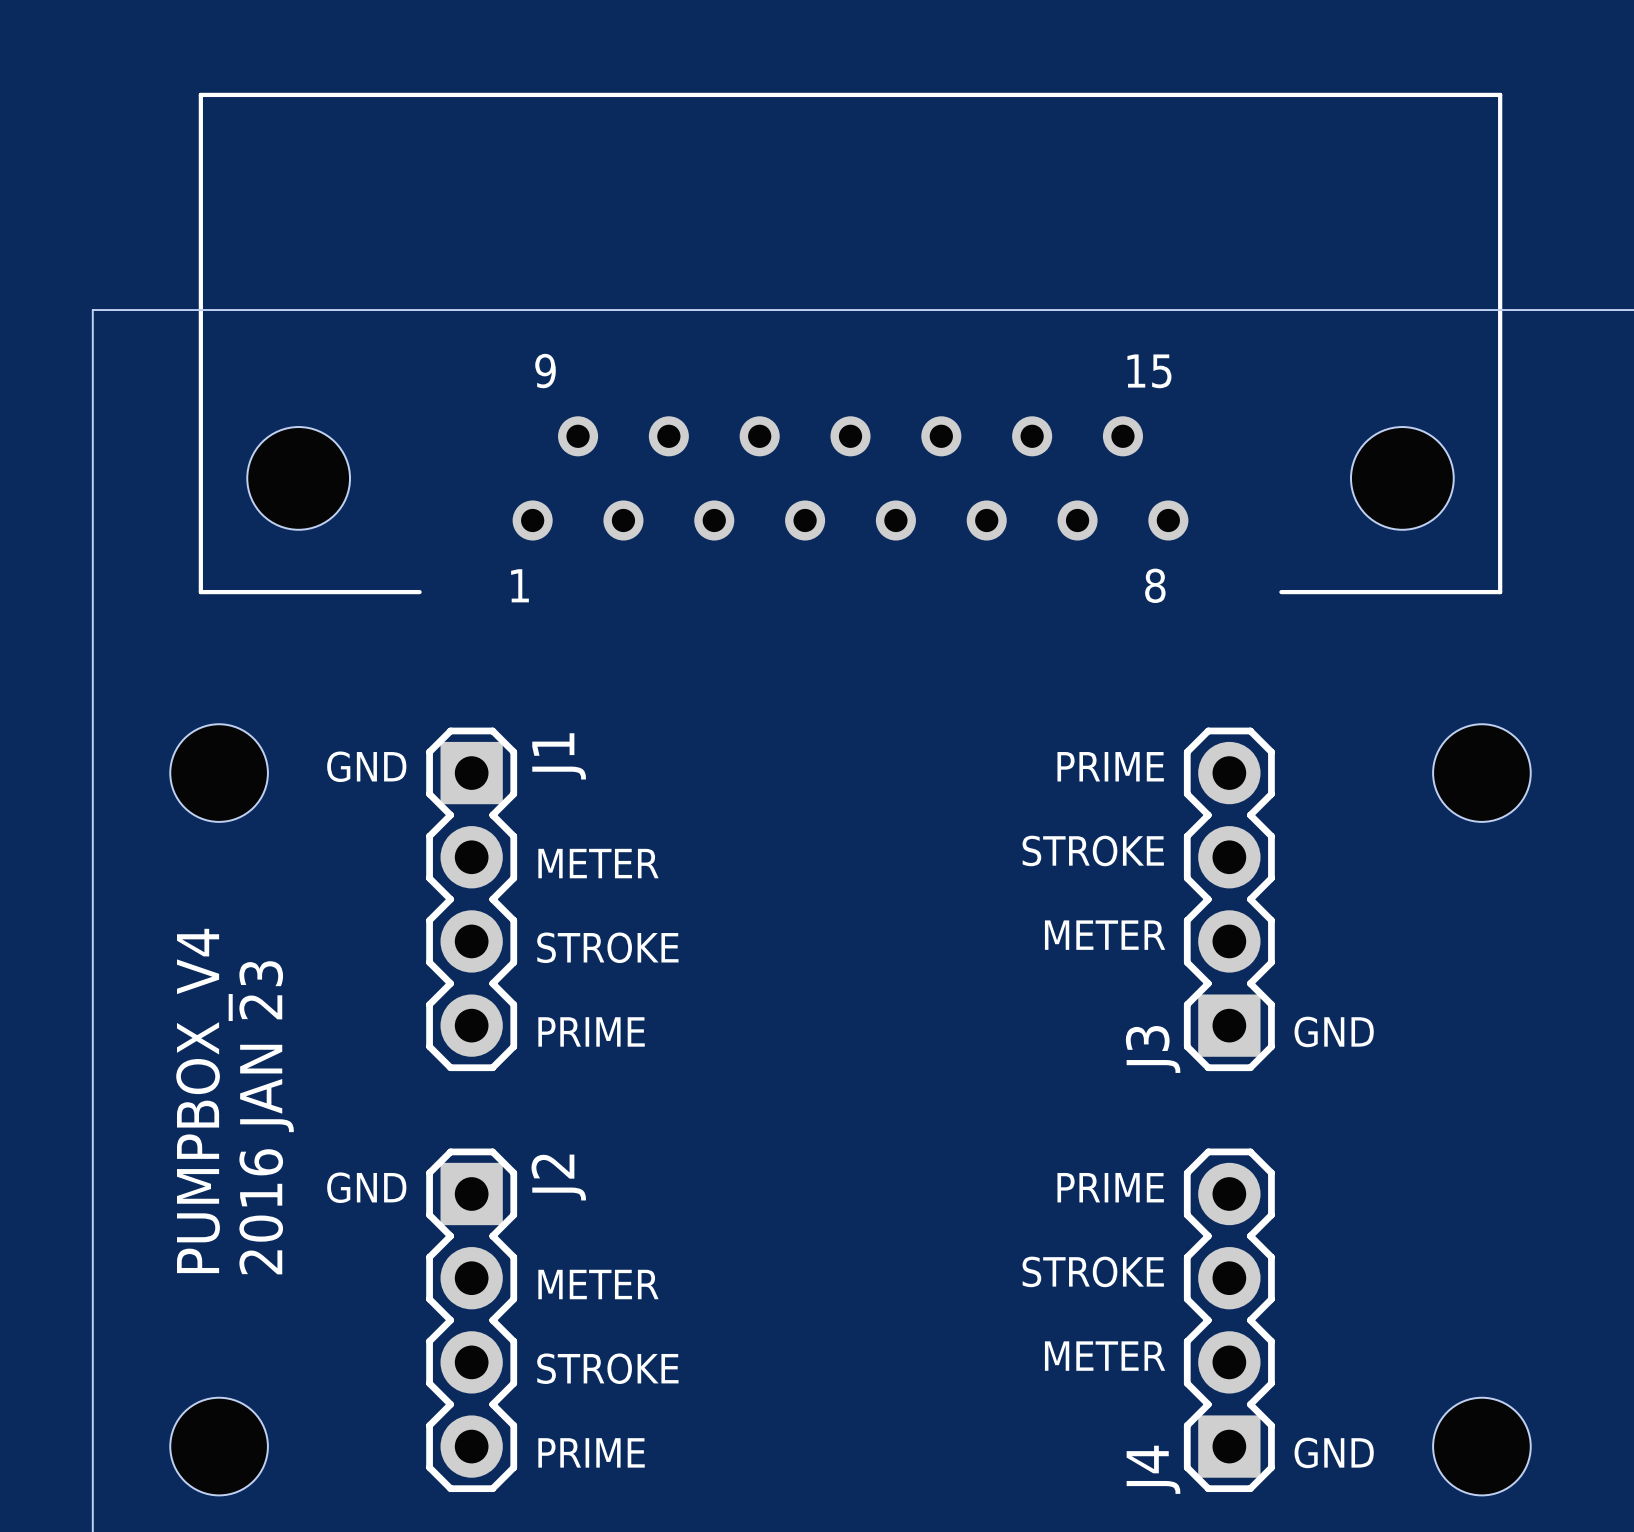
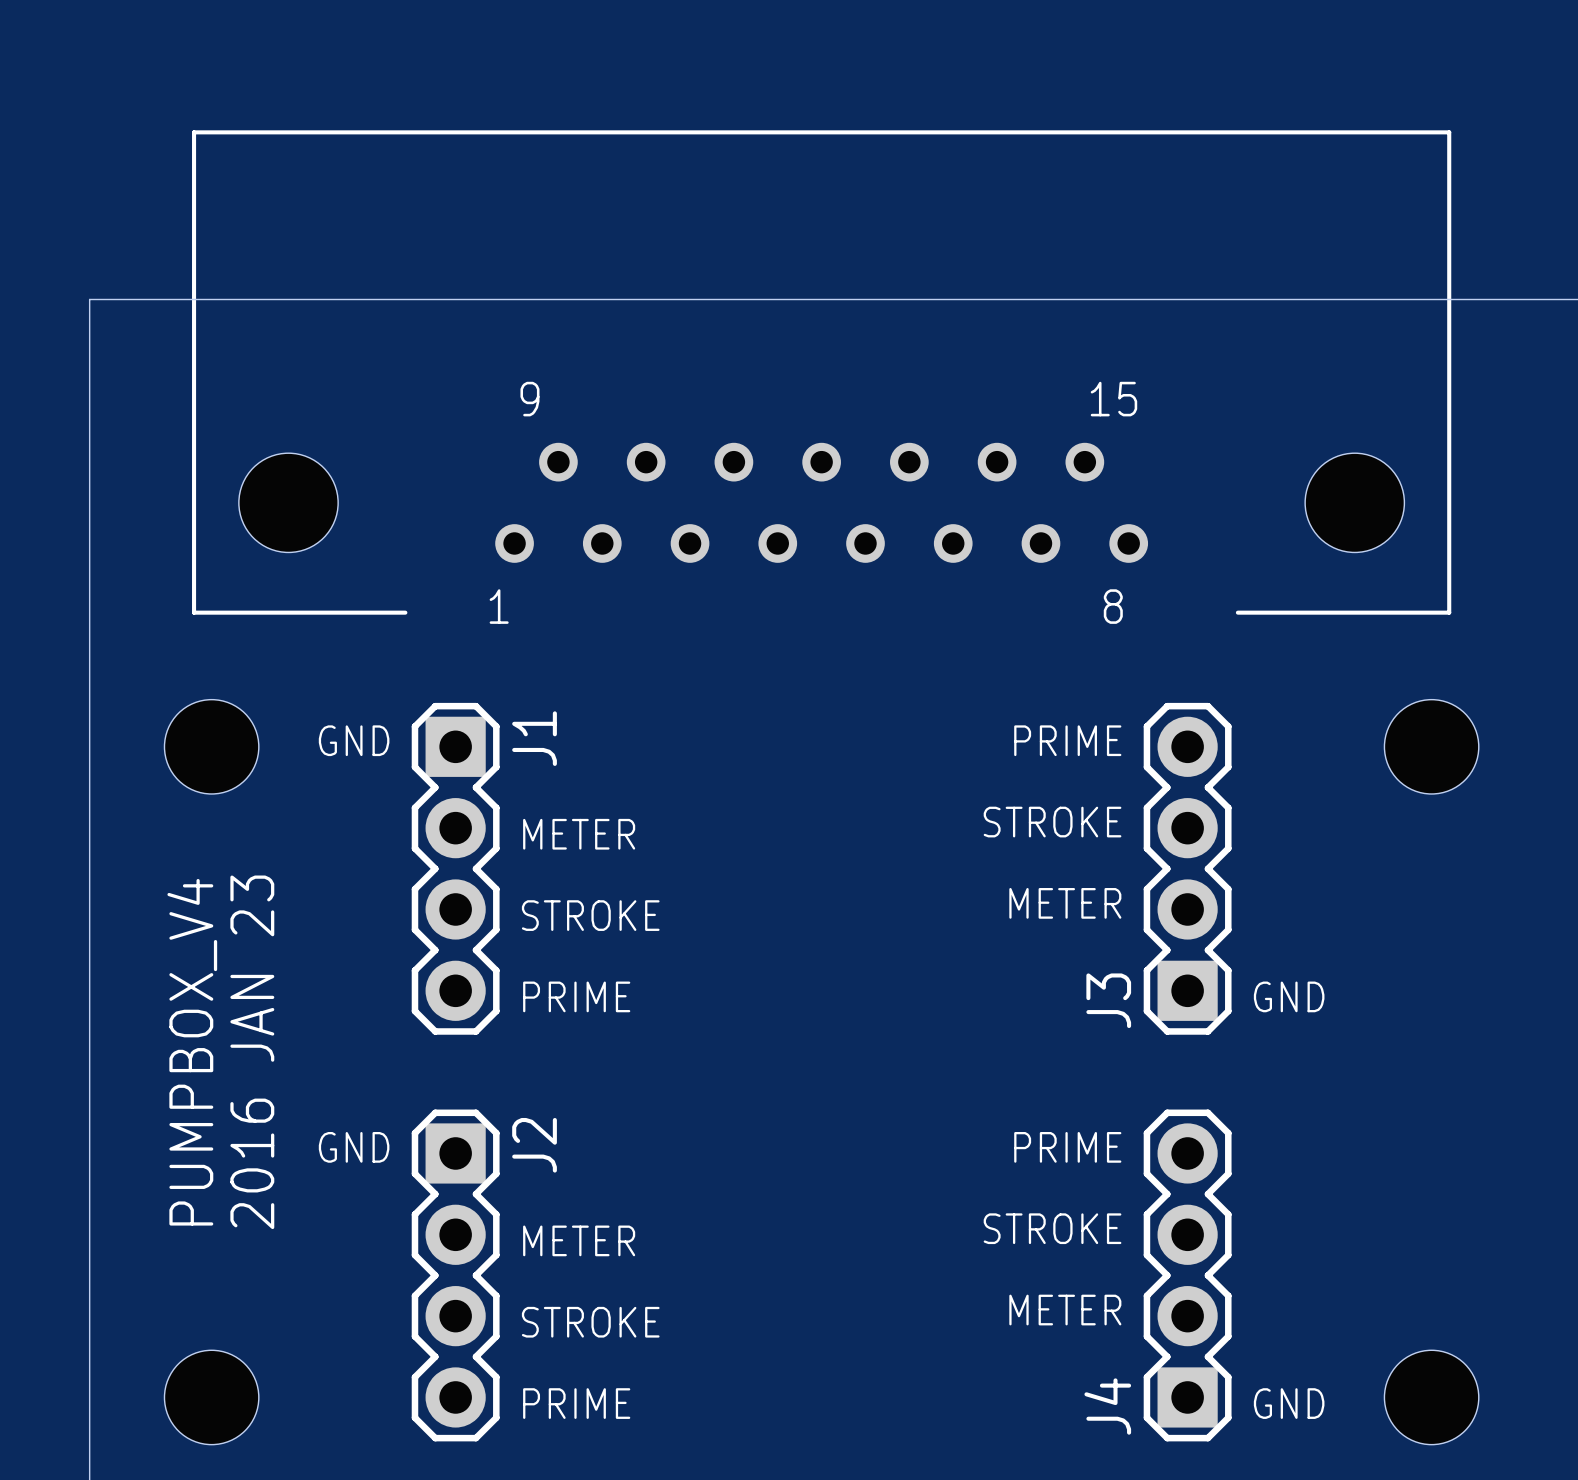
part position: (850, 343) -> (821, 372)

